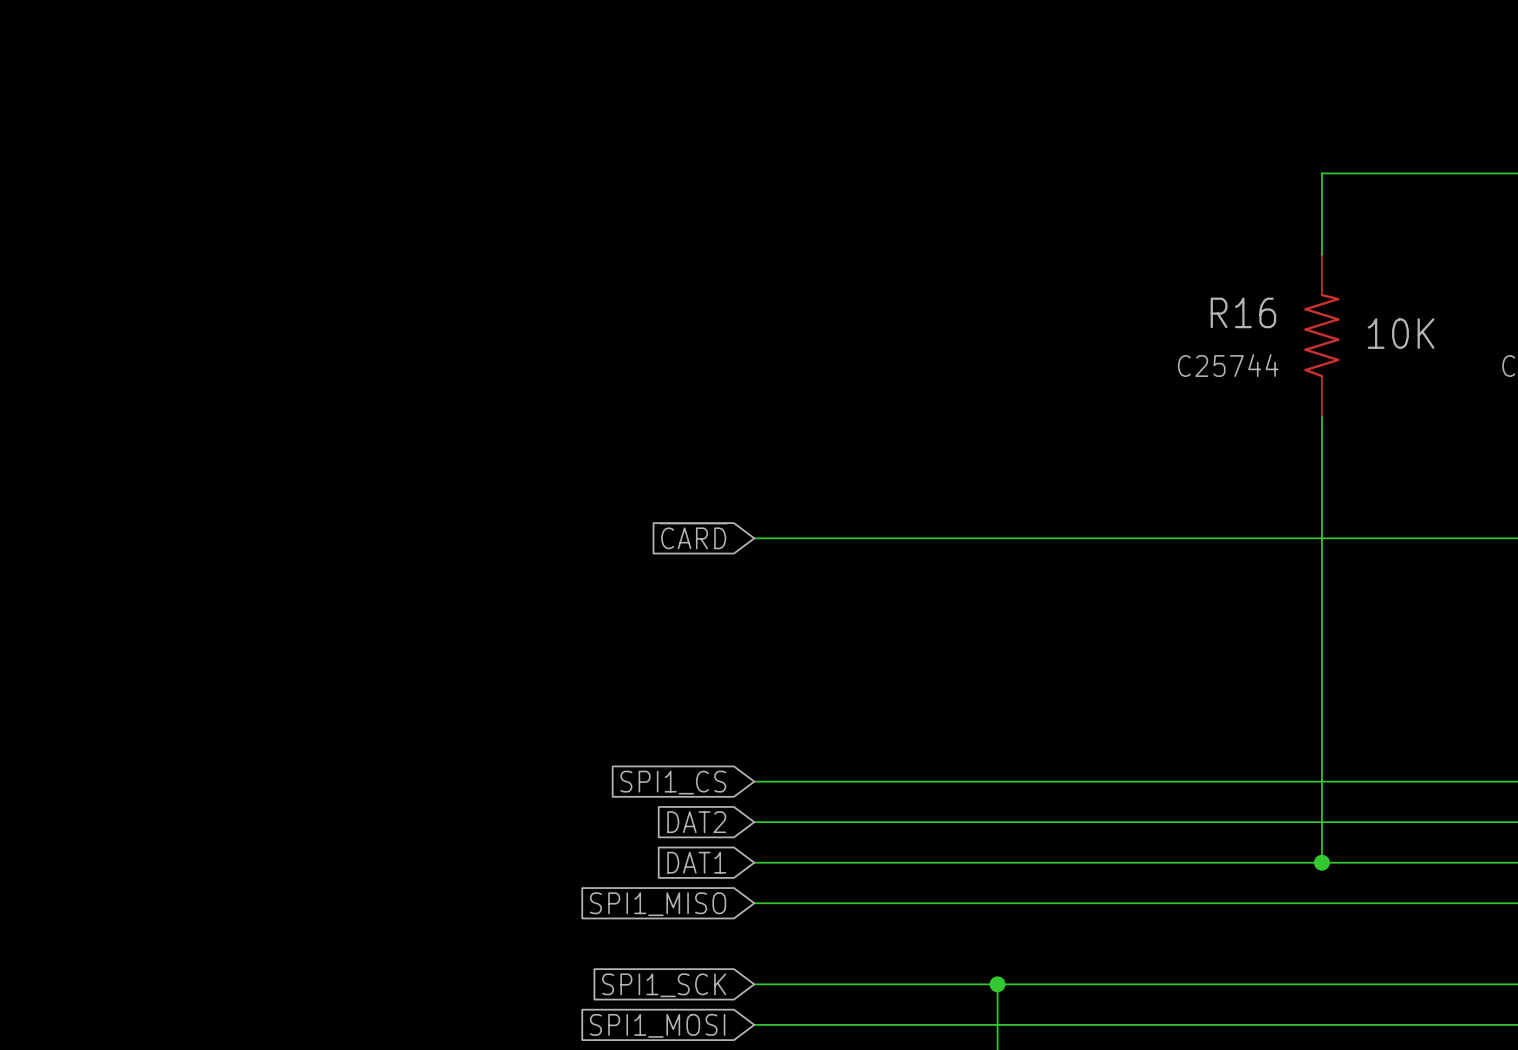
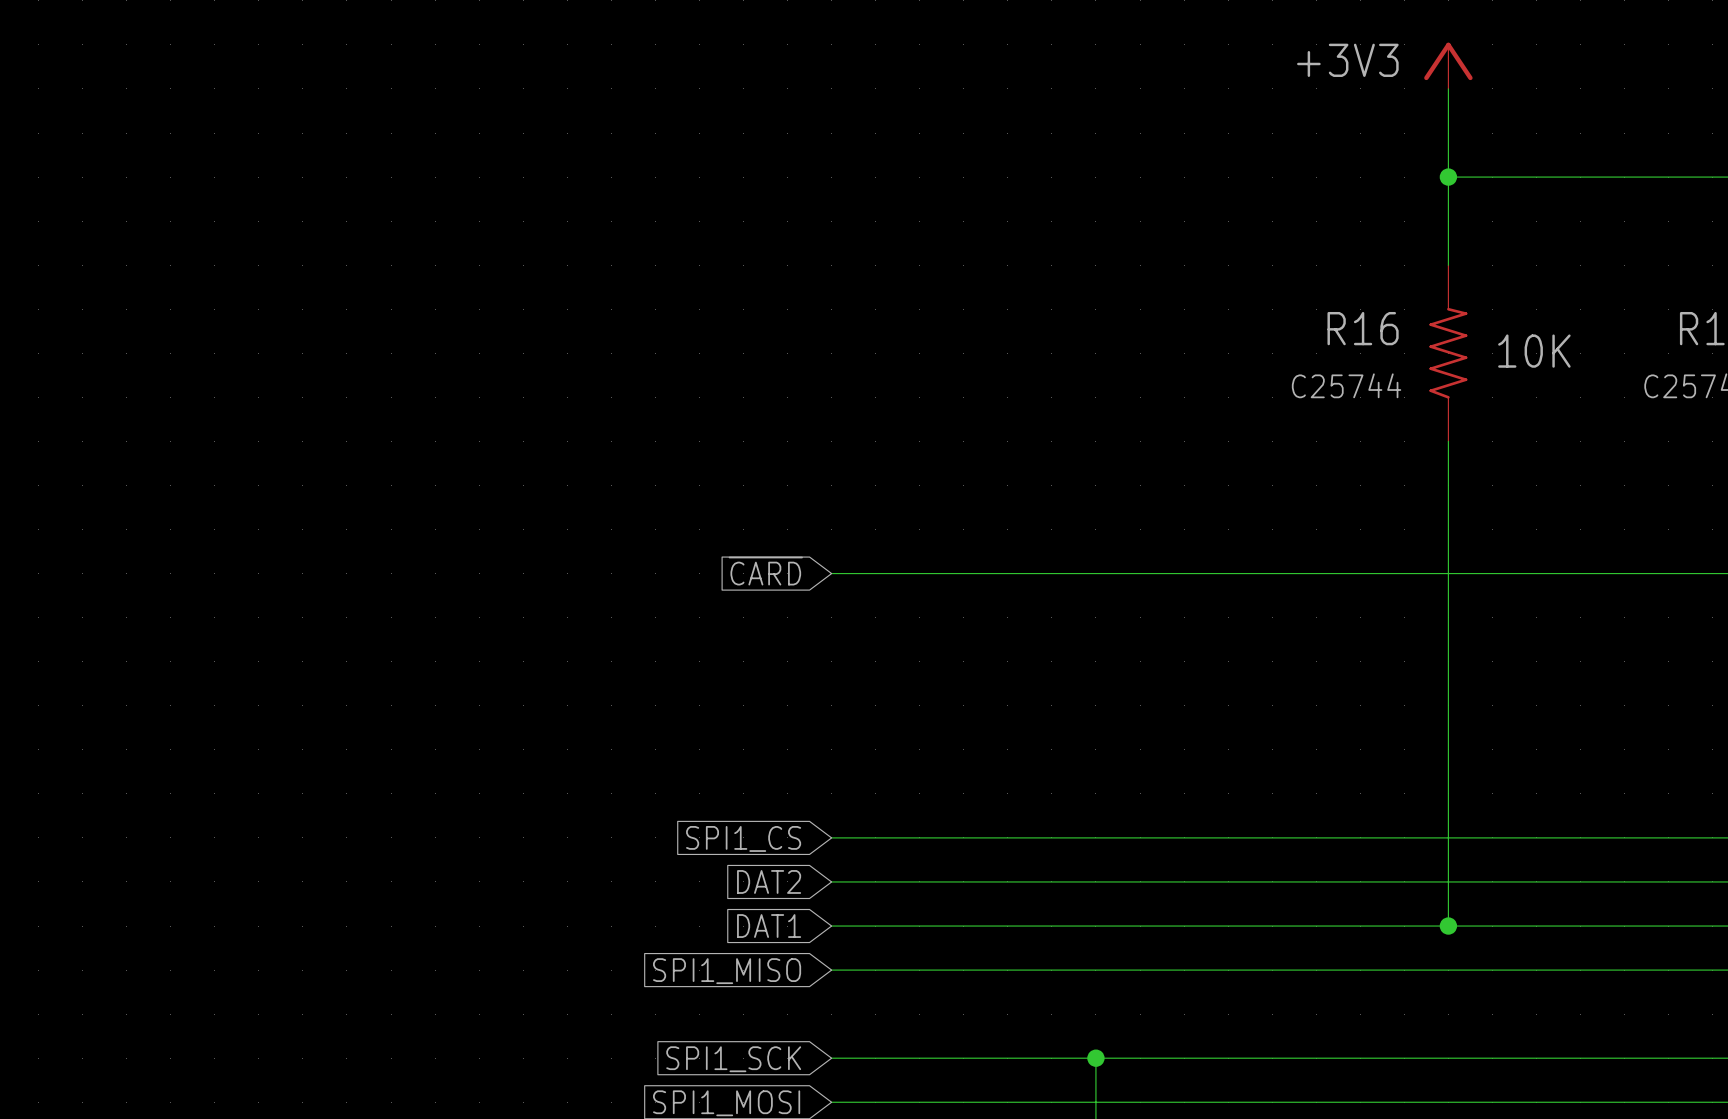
power symbol: none -> +3V3 (1448, 65)
wire: none -> (1448, 88) (1448, 177)
junction: none -> (1448, 177)

